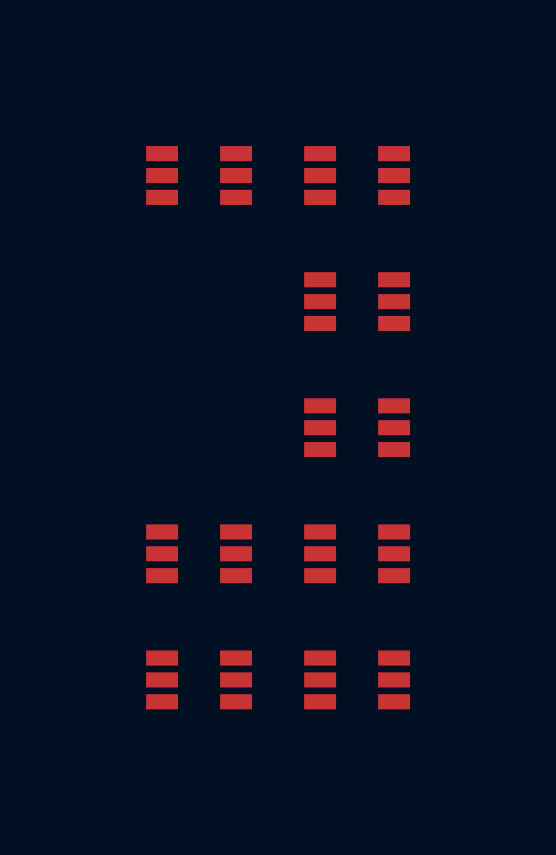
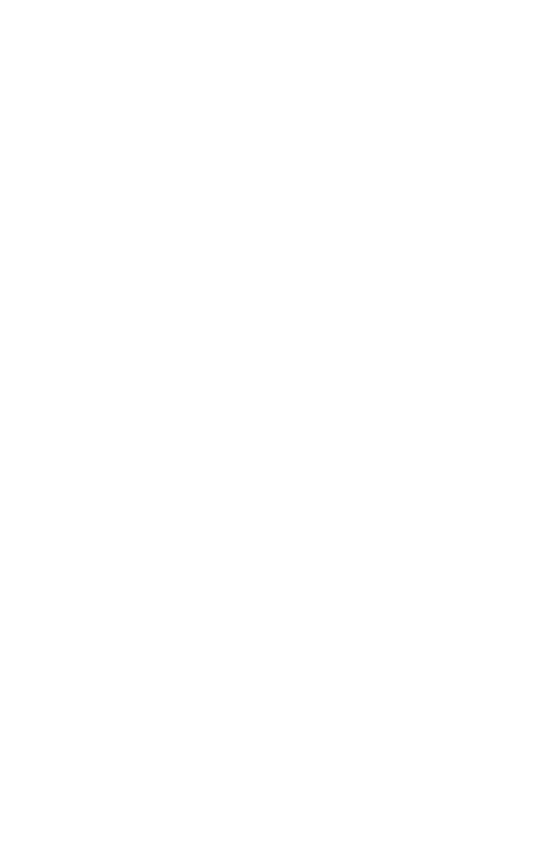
part: (199, 175) -> none
part: (357, 175) -> none
part: (357, 301) -> none
part: (357, 427) -> none
part: (199, 553) -> none
part: (357, 553) -> none
part: (199, 679) -> none
part: (357, 679) -> none

